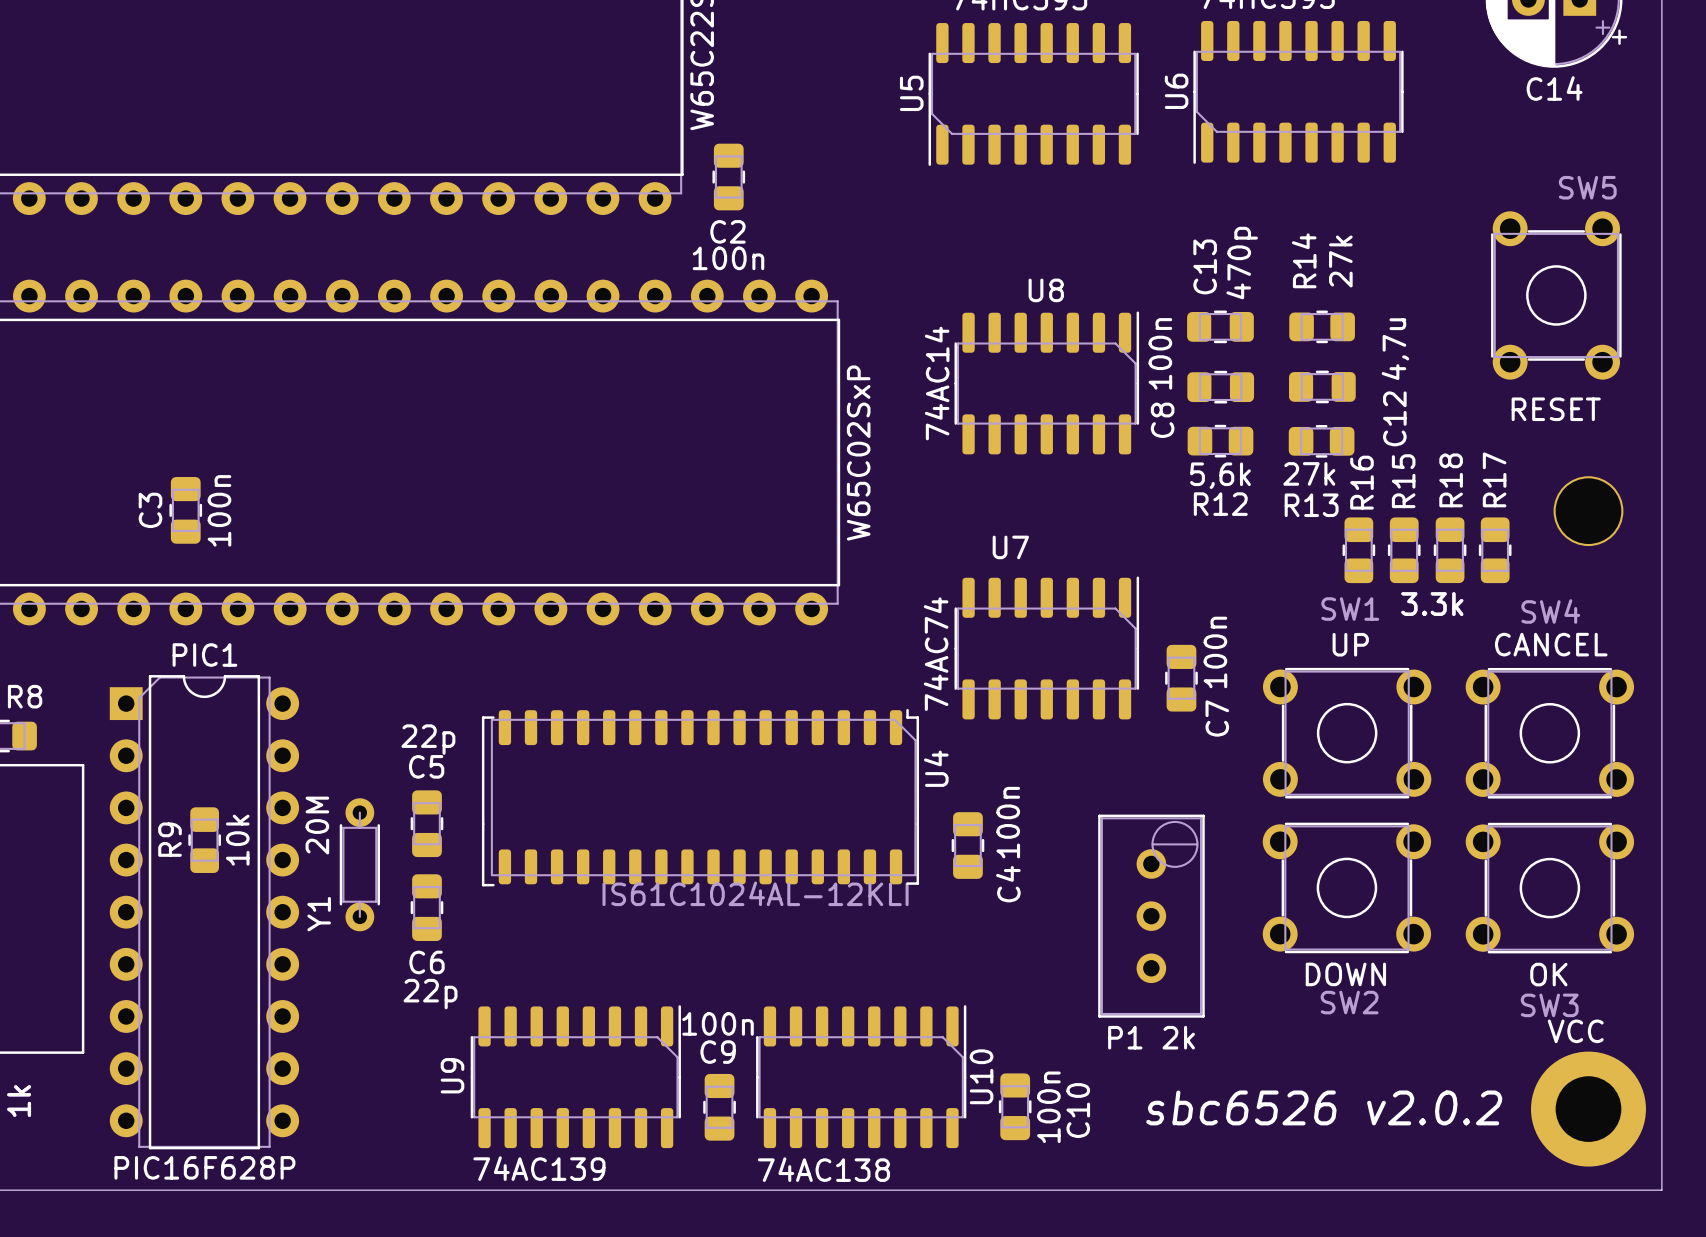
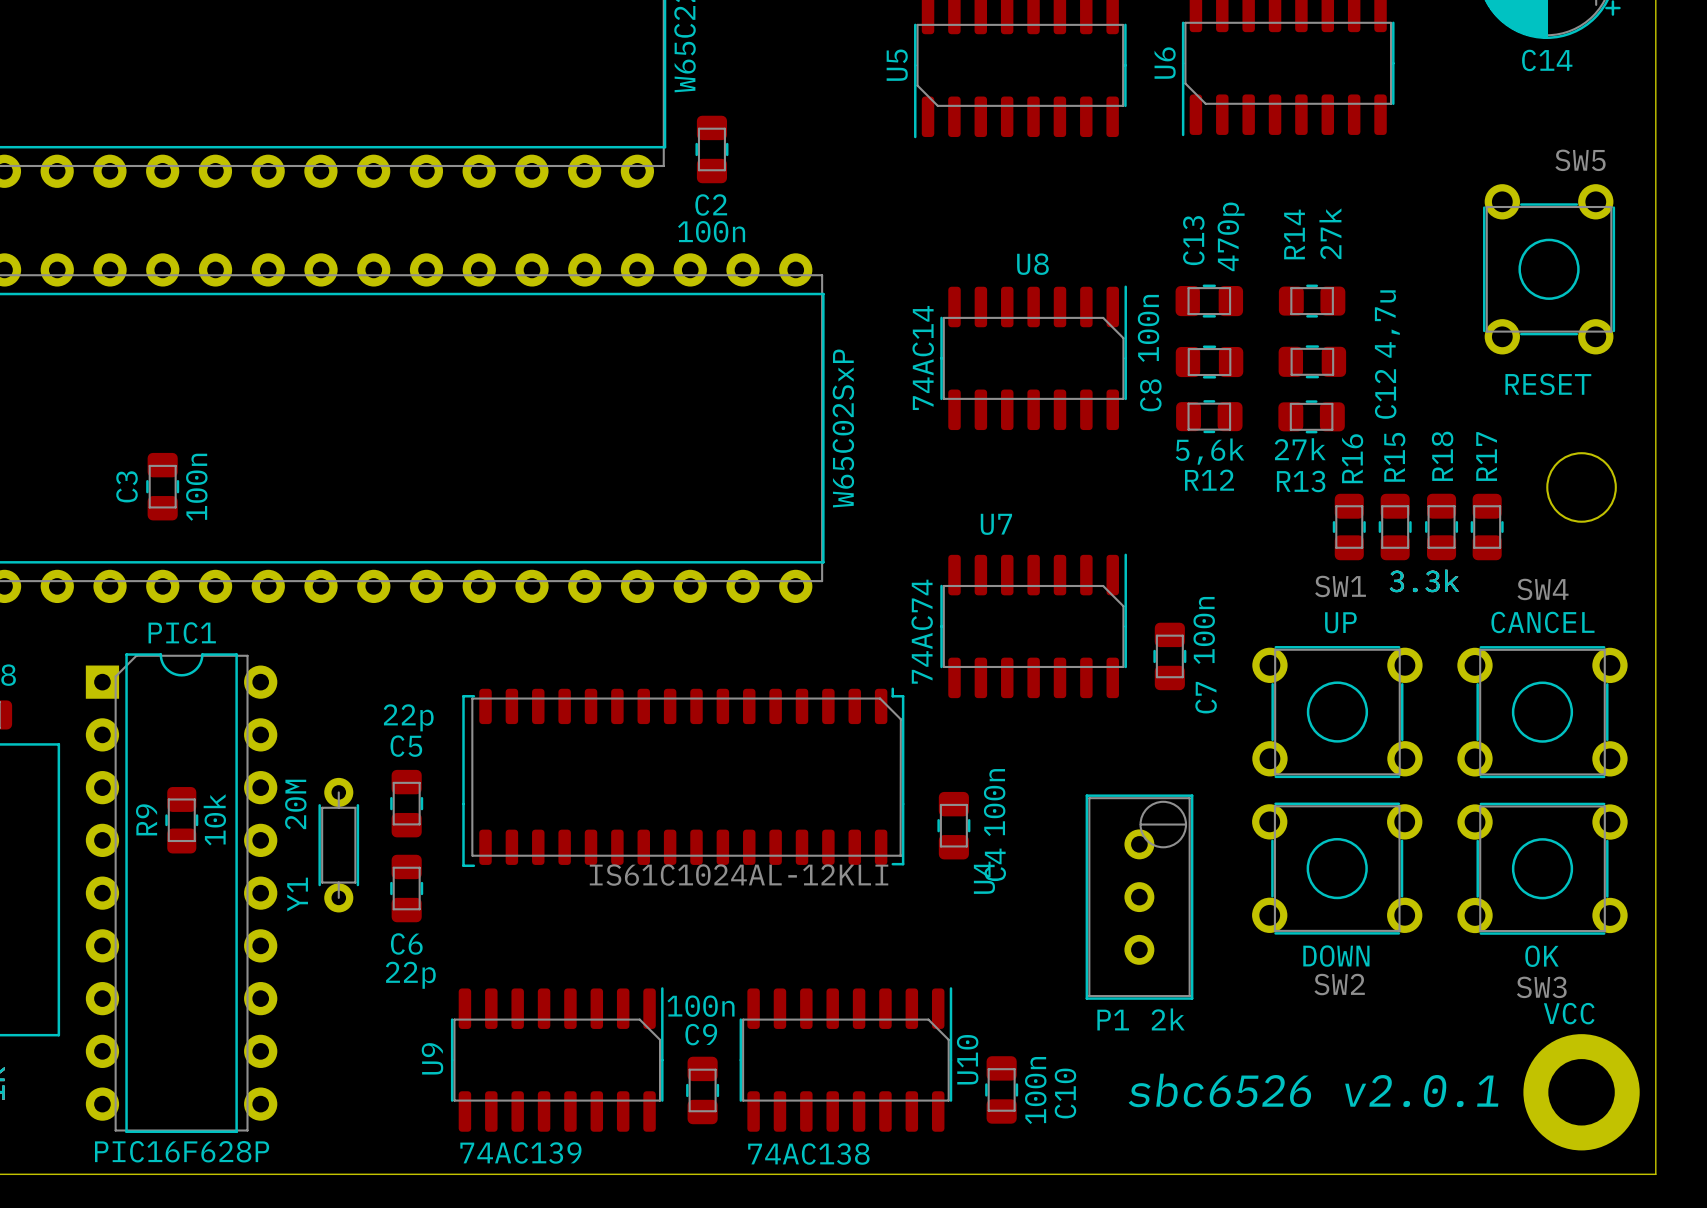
U4 name position: U4 (936, 768) -> U4 (984, 877)
text: sbc6526 v2.0.2 (1324, 1107) -> sbc6526 v2.0.1 (1313, 1090)

